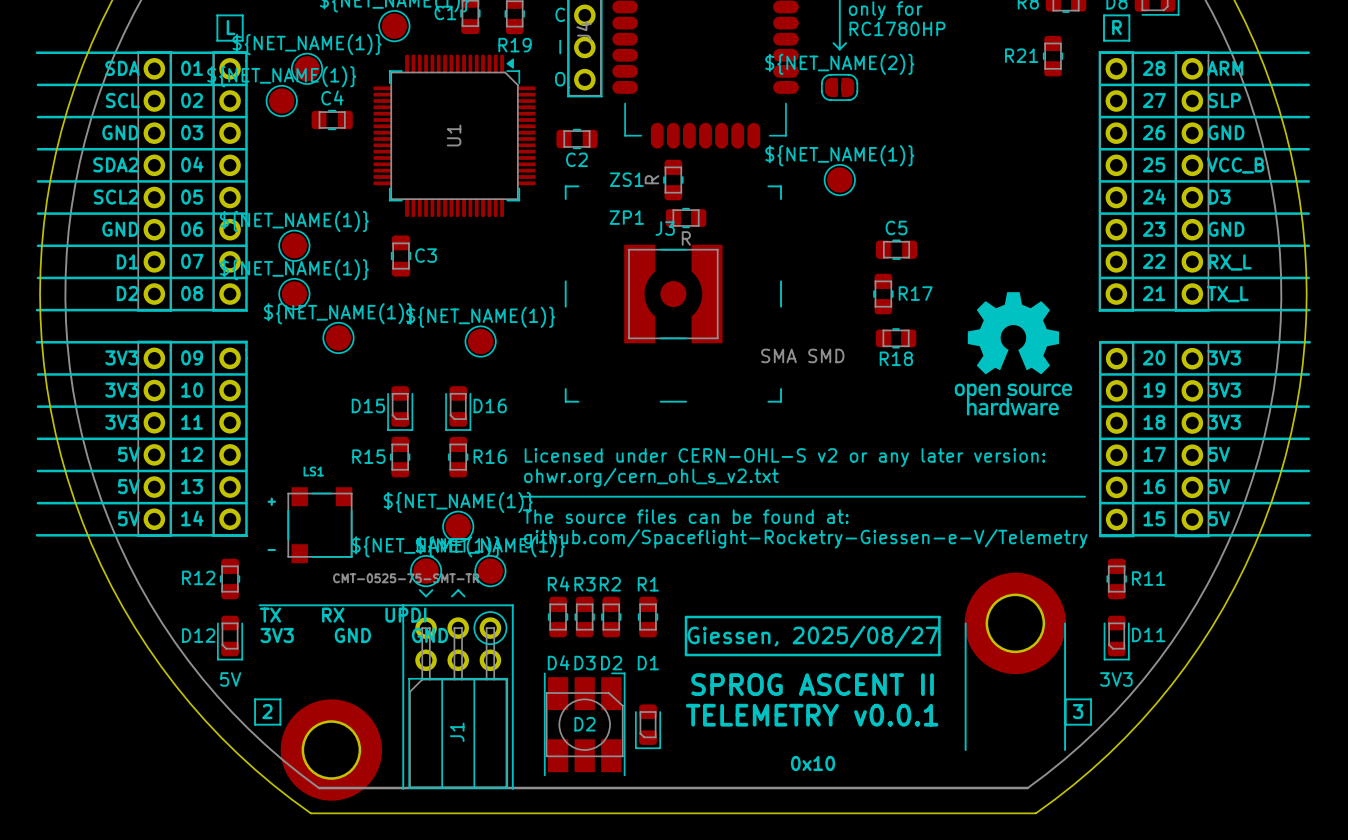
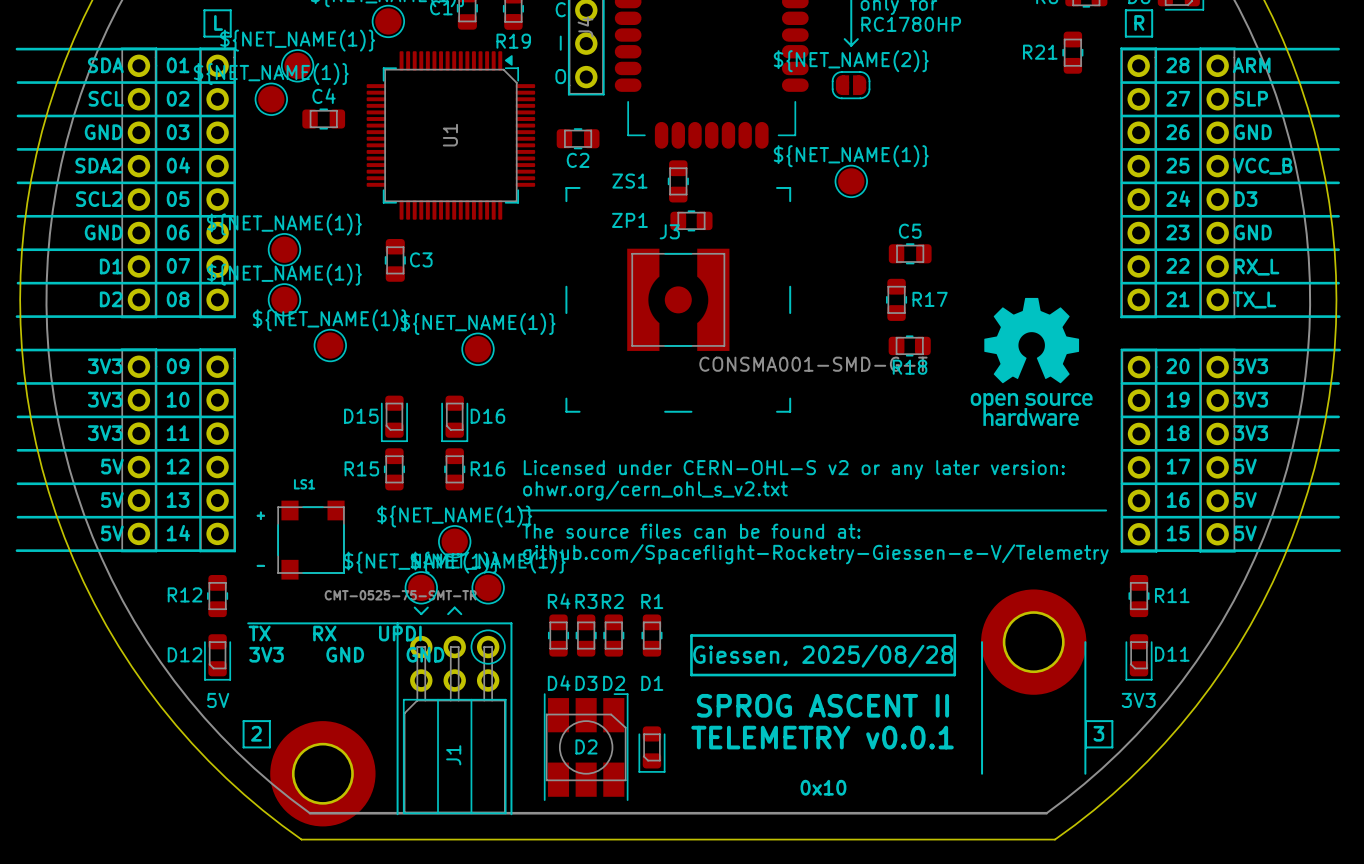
ZS1 value: R (651, 179) -> none
ZP1 value: R (686, 238) -> none
J3 value: SMA SMD (802, 355) -> CONSMA001-SMD-G-T (813, 364)
text: Giessen, 2025/08/27 (813, 636) -> Giessen, 2025/08/28 (823, 656)

